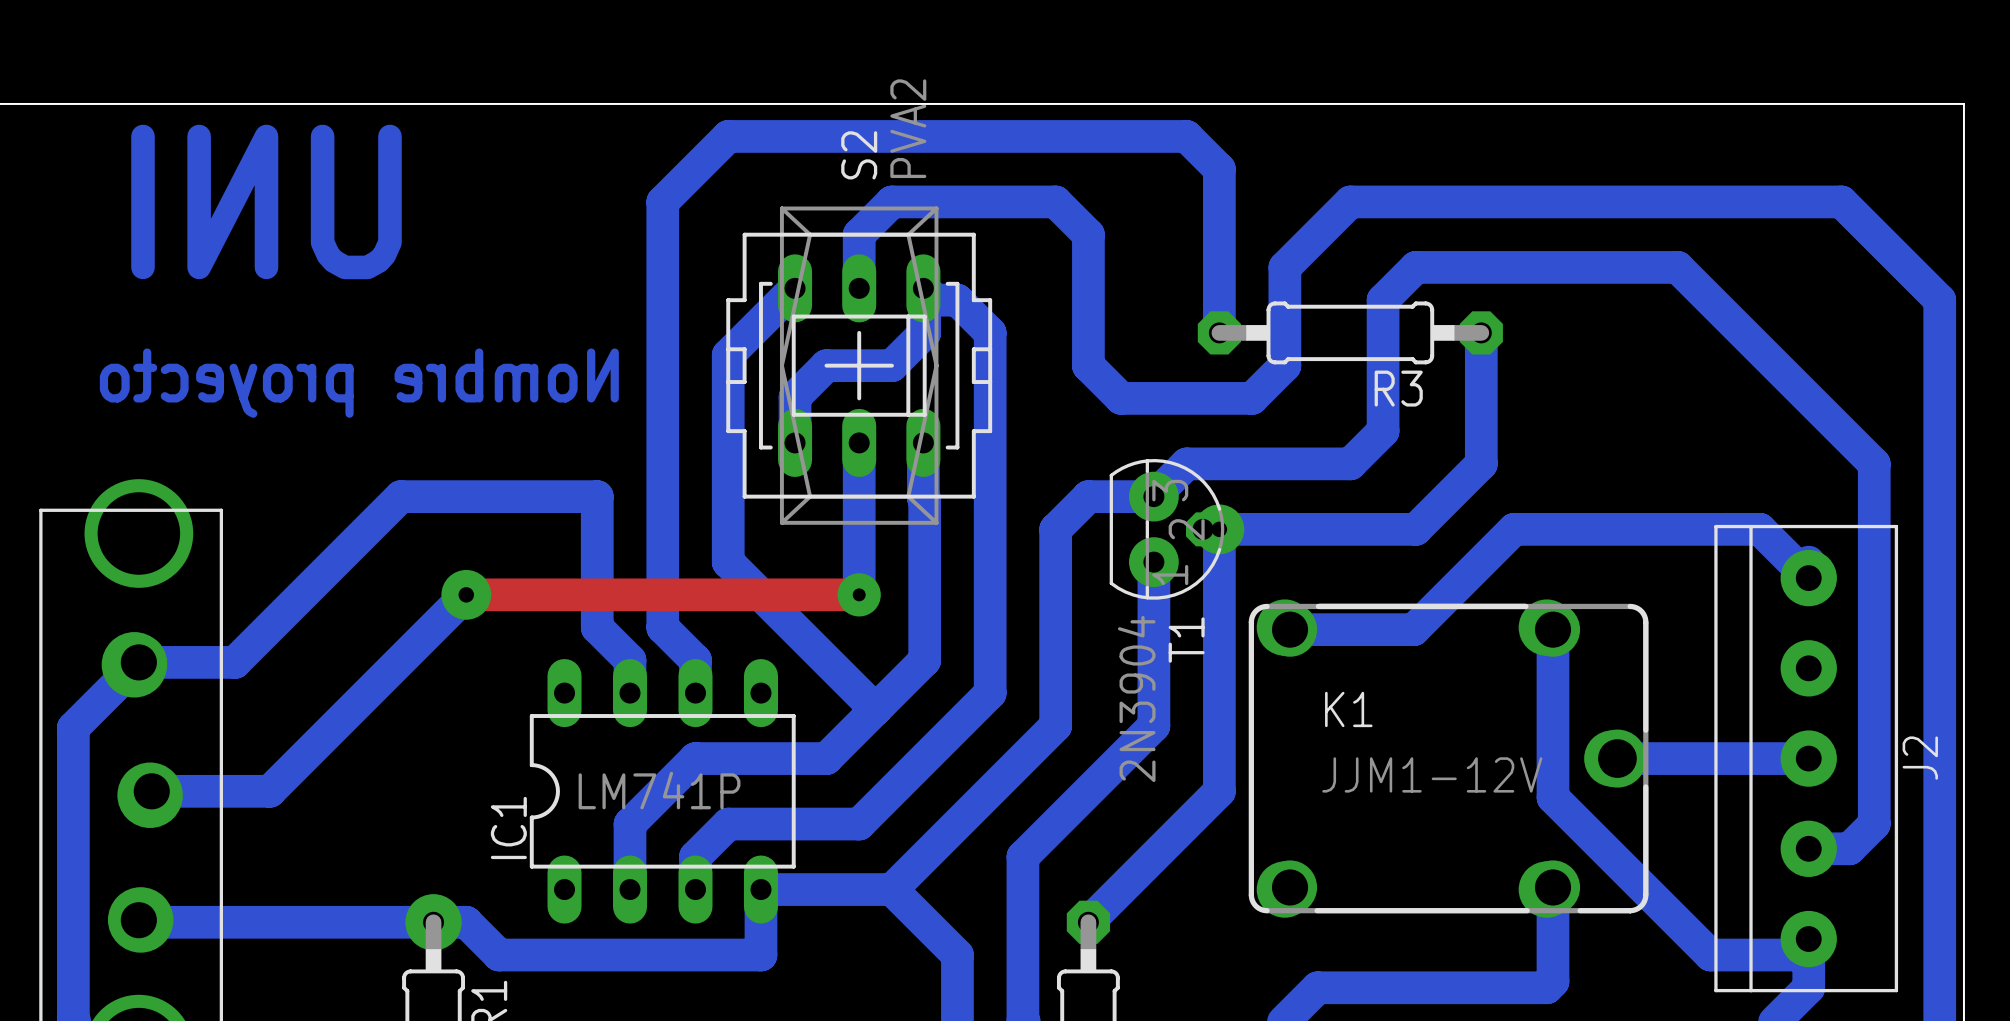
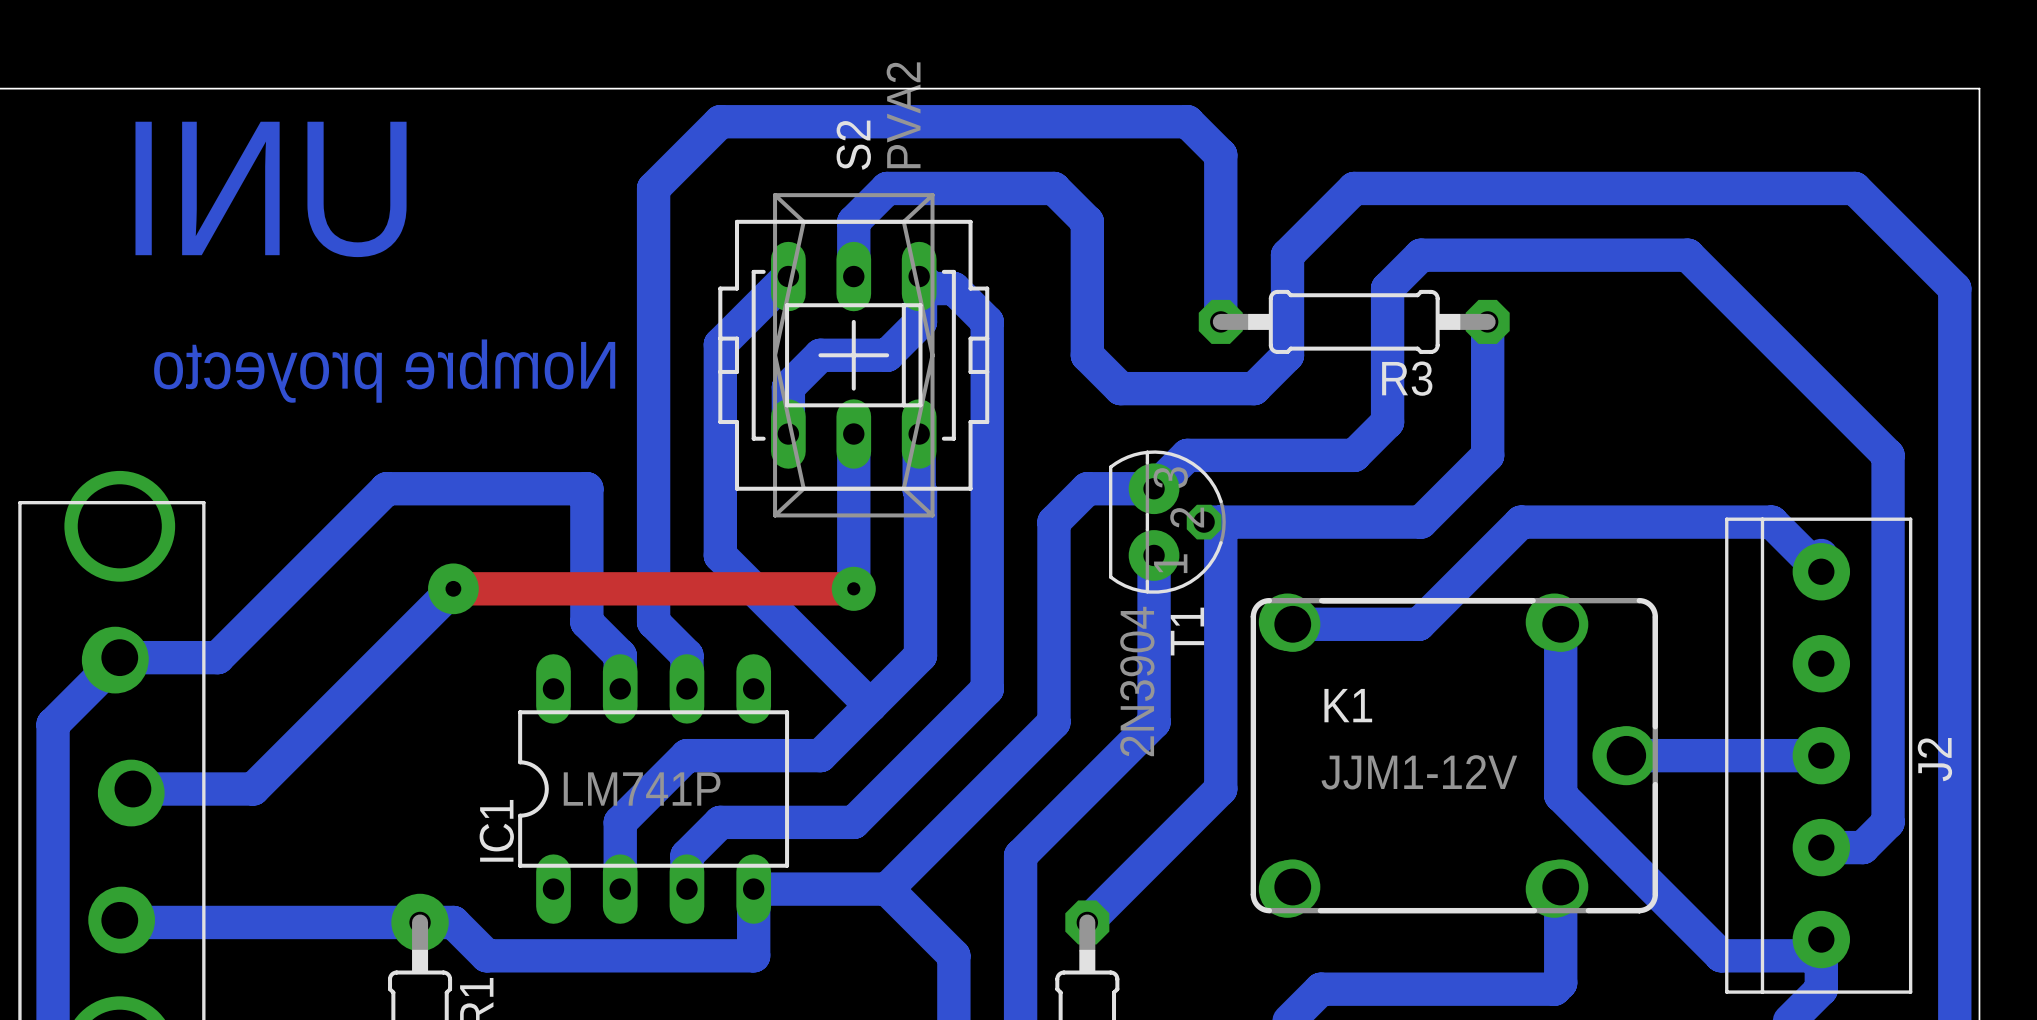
via: (1219, 529) -> none

